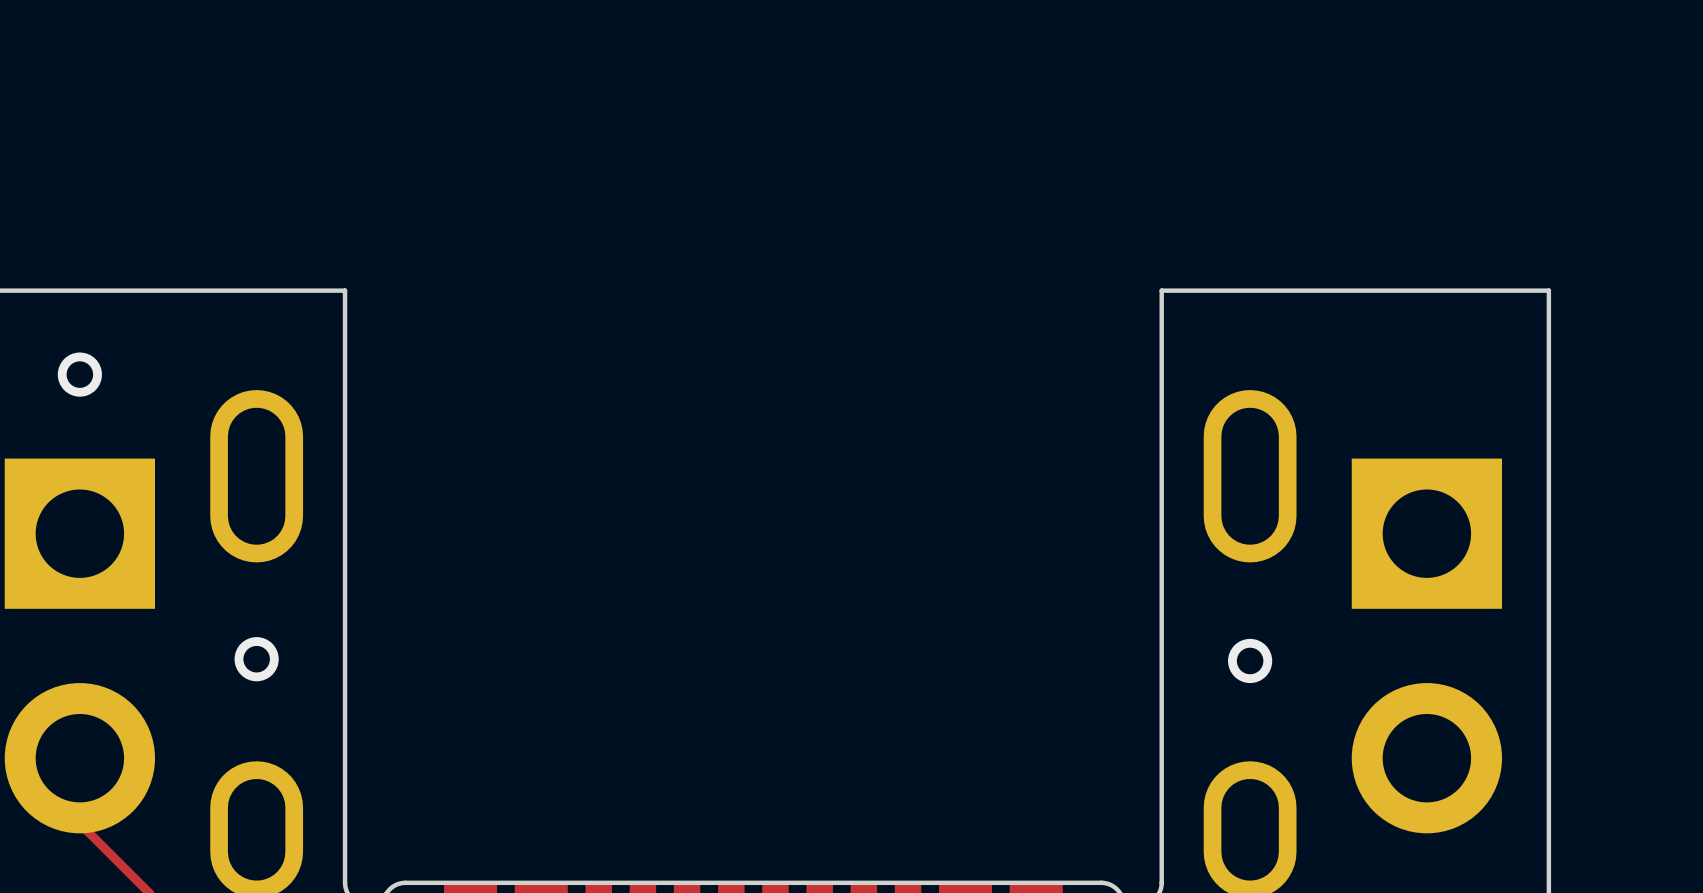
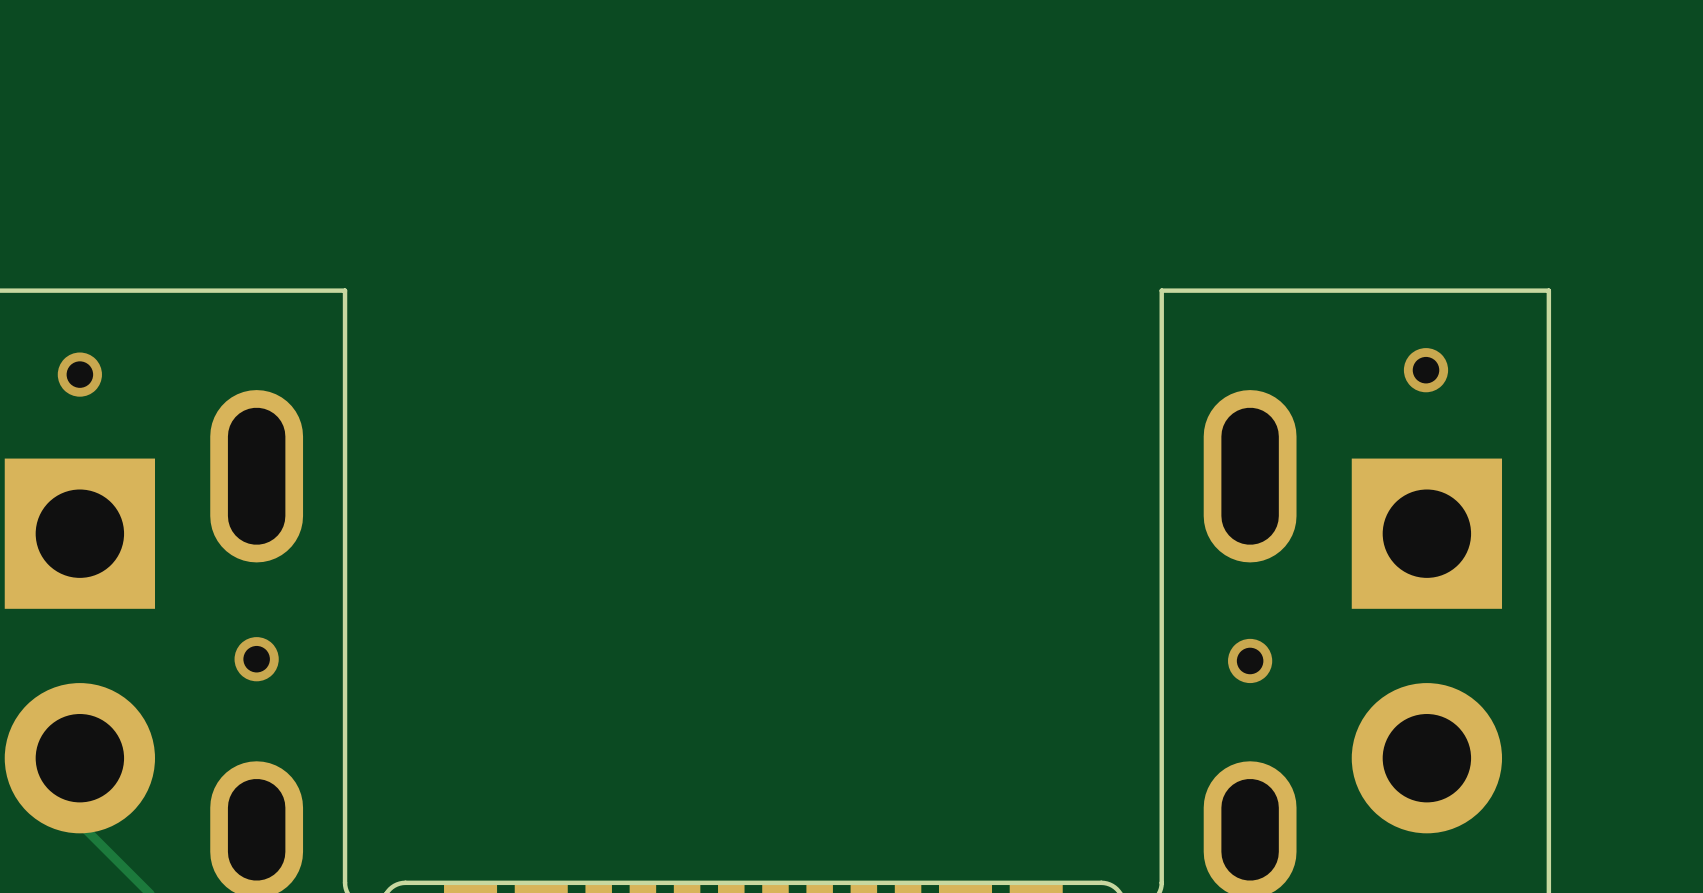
via: none -> (1426, 370)

